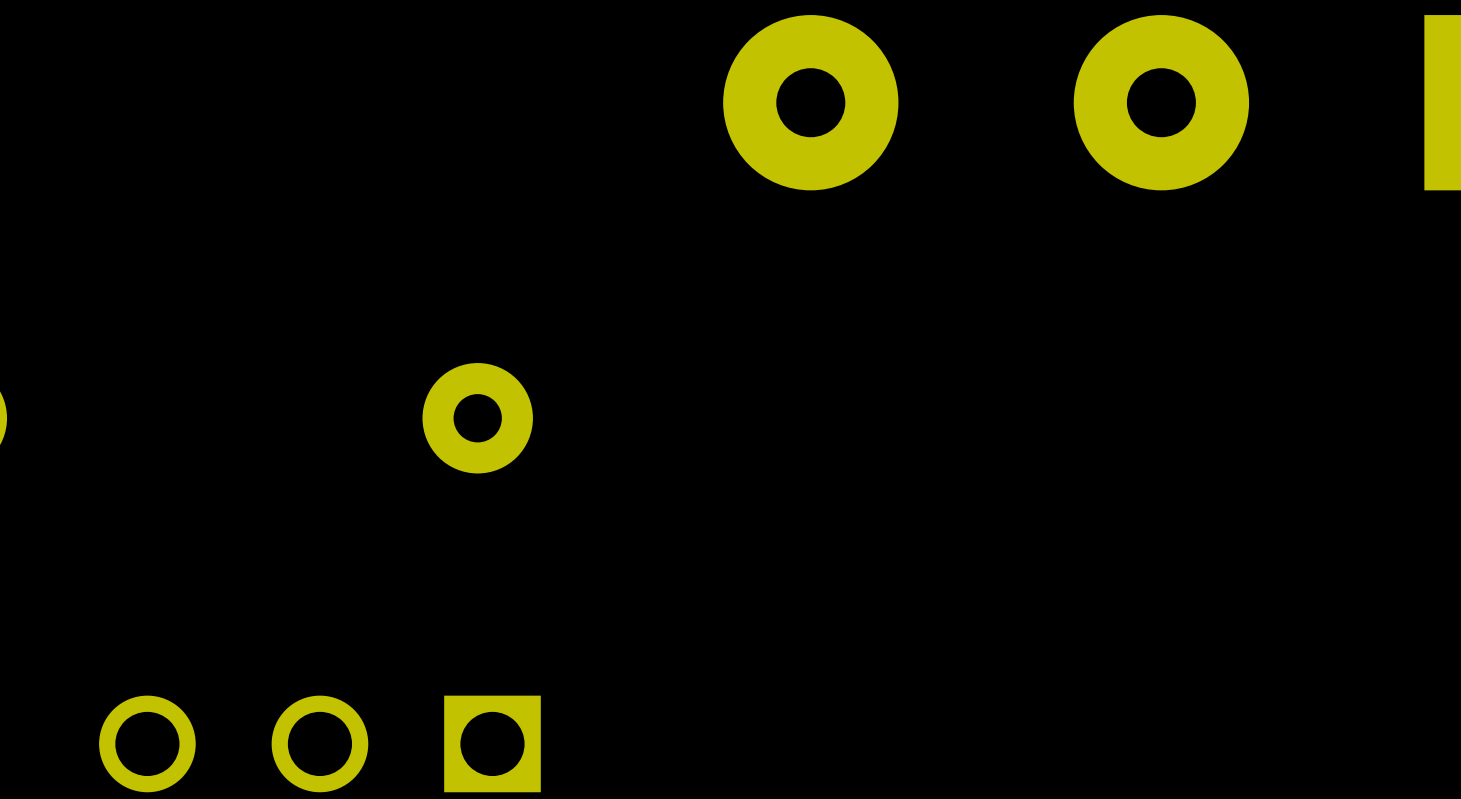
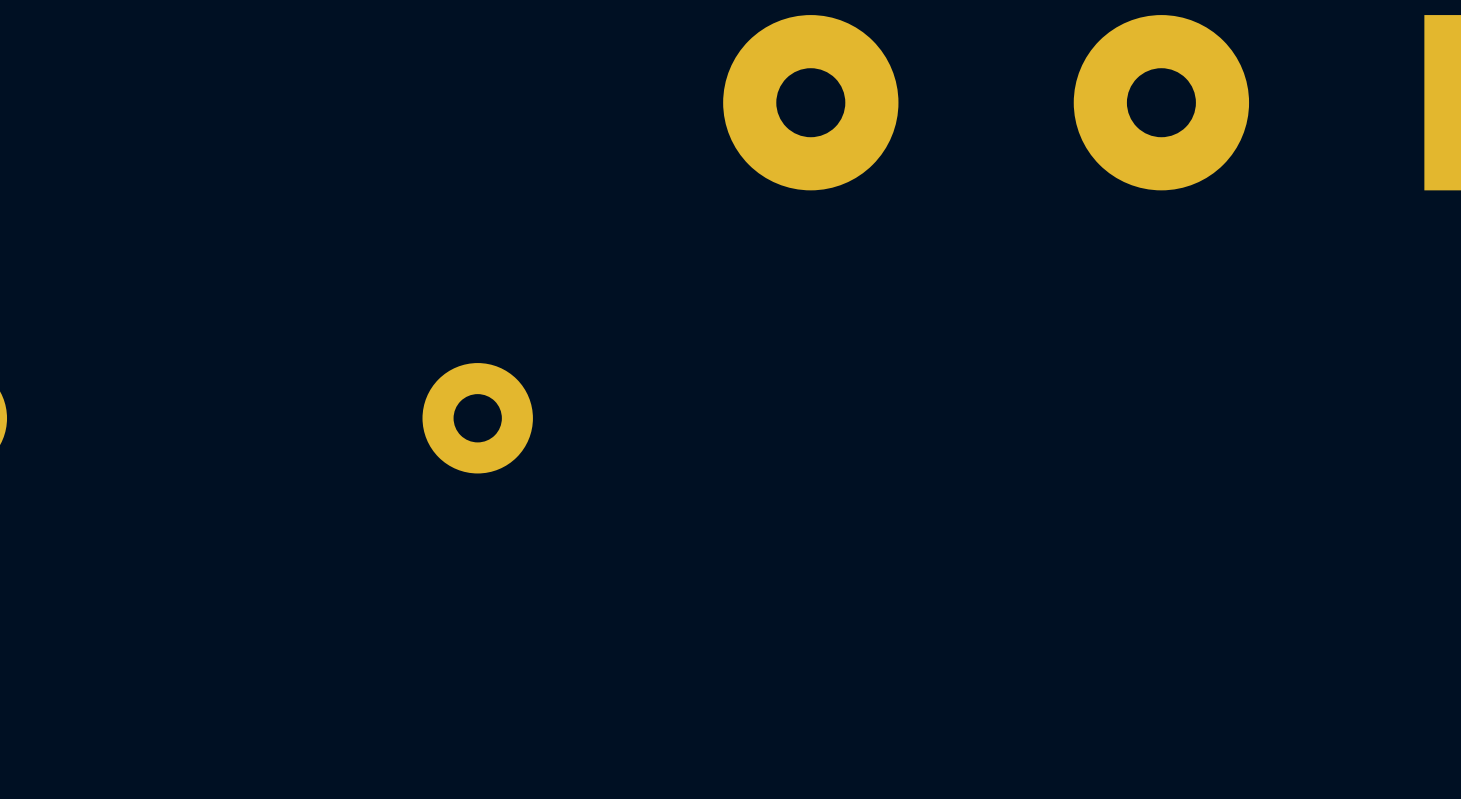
part: (319, 743) -> none

